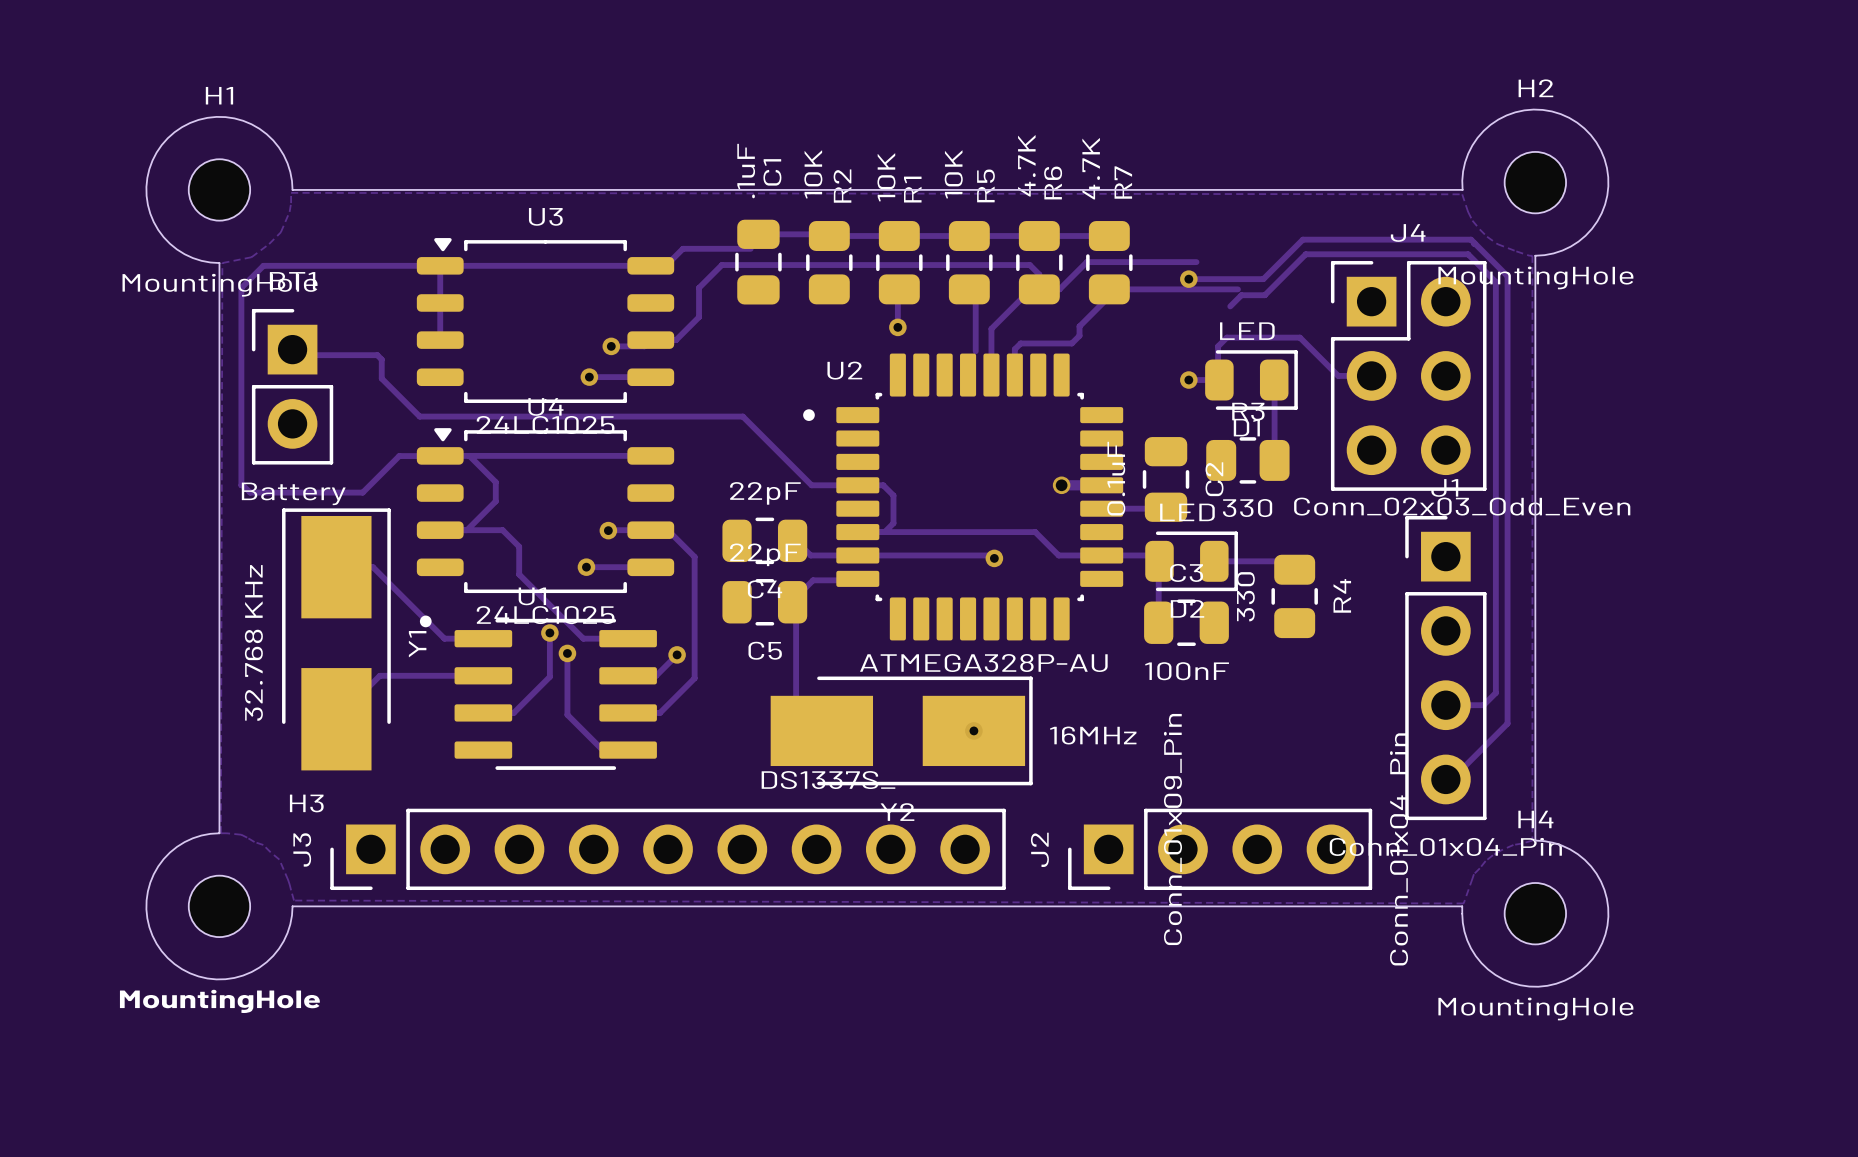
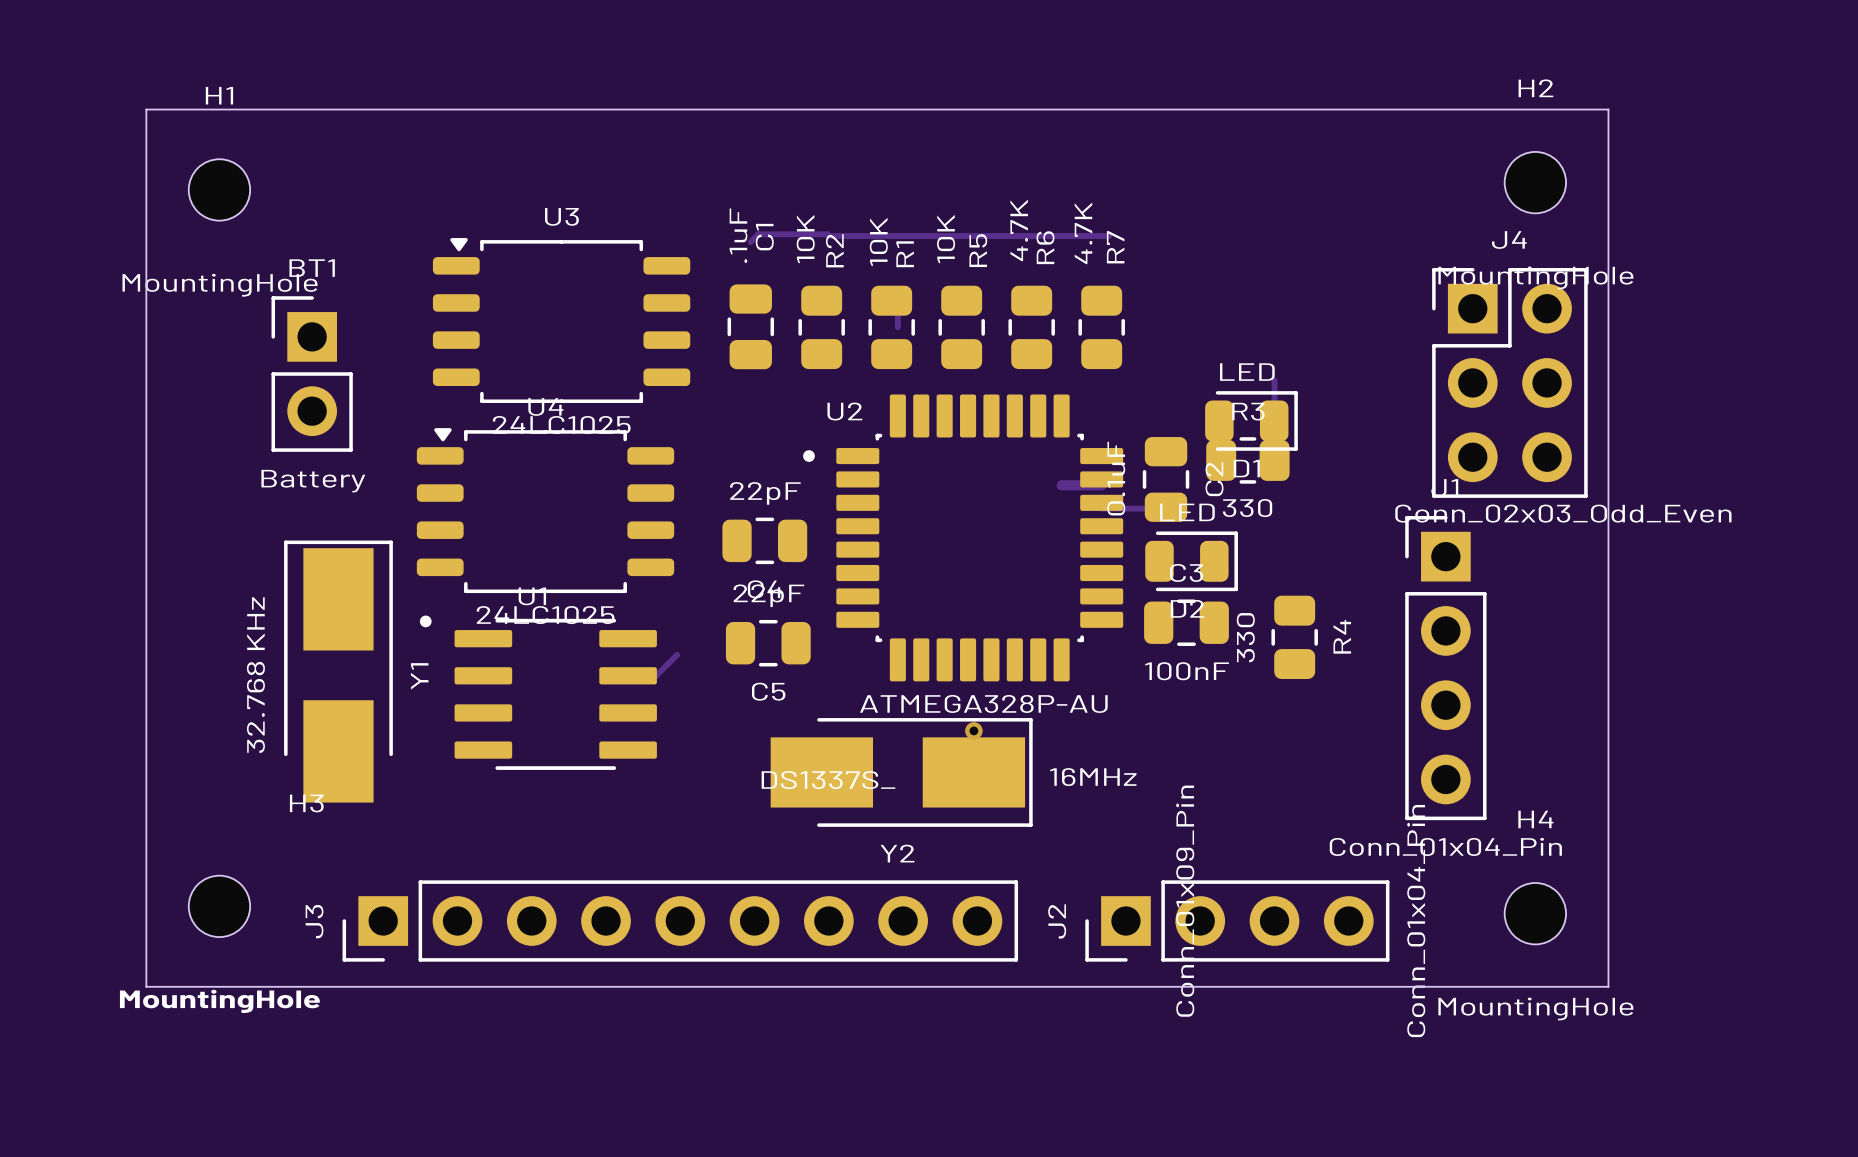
board edge: (292, 189) (1462, 189) (1463, 171) (1468, 153) (1477, 137) (1490, 124) (1506, 115) (1533, 109) (1551, 111) (1569, 117) (1590, 135) (1601, 150) (1606, 167) (1608, 186) (1601, 213) (1585, 235) (1562, 250) (1535, 255) (1535, 840) (1553, 842) (1570, 849) (1584, 859) (1596, 873) (1606, 898) (1608, 916) (1605, 934) (1598, 951) (1580, 971) (1556, 983) (1529, 986) (1511, 982) (1495, 974) (1475, 956) (1464, 931) (1462, 906) (292, 906) (290, 924) (283, 941) (273, 955) (259, 967) (243, 975) (225, 979) (198, 976) (182, 969) (161, 951) (152, 935) (147, 918) (146, 900) (153, 874) (169, 852) (192, 838) (219, 833) (219, 263) (192, 258) (176, 249) (163, 237) (153, 222) (147, 204) (147, 177) (156, 152) (174, 132) (198, 119) (225, 117) (251, 124) (273, 140) (287, 163) (292, 189) -> (146, 109) (146, 986) (1608, 986) (1608, 109) (146, 109)
zone outline: (291, 192) (1462, 194) (1472, 220) (1487, 236) (1497, 244) (1532, 255) (1532, 840) (1513, 844) (1500, 850) (1485, 861) (1473, 874) (1463, 903) (294, 900) (279, 859) (263, 844) (241, 834) (220, 833) (222, 263) (251, 257) (280, 232) (289, 211) (291, 192) -> none
track: (750, 248) (682, 248) (665, 265) (263, 265) (241, 287) (241, 485) (250, 492) (362, 492) (399, 456) (440, 456) -> none
C1 position: (758, 262) -> (750, 326)
R2 position: (829, 262) -> (821, 327)
R1 position: (899, 262) -> (891, 327)
R5 position: (969, 262) -> (961, 327)
R6 position: (1039, 262) -> (1031, 327)
R7 position: (1109, 262) -> (1101, 327)
track: (1196, 262) (1086, 262) (1059, 289) (1030, 289) (991, 328) (991, 375) -> none
track: (440, 265) (440, 340) -> none
track: (1188, 279) (1263, 279) (1302, 239) (1471, 239) (1507, 276) (1507, 723) (1450, 780) (1445, 779) -> none
via: (1188, 279) -> none
track: (969, 289) (975, 295) (975, 351) -> none
track: (1039, 289) (1039, 274) (1029, 265) (721, 265) (699, 287) (699, 317) (676, 340) (650, 340) (644, 346) (611, 346) -> none
track: (1237, 289) (1109, 289) (1109, 296) (1079, 326) (1079, 335) (1071, 343) (1020, 343) (1014, 349) (1014, 375) -> none
track: (1230, 306) (1241, 295) (1264, 295) (1305, 254) (1468, 254) (1495, 282) (1495, 692) (1483, 705) (1445, 705) -> none
U3 position: (545, 320) -> (561, 320)
via: (897, 327) -> none
via: (611, 346) -> none
track: (292, 349) (298, 355) (377, 355) (381, 359) (381, 378) (419, 416) (742, 416) (811, 485) (883, 485) (893, 495) (893, 523) (884, 532) -> none
track: (1371, 375) (1338, 375) (1299, 337) (1226, 337) (1218, 346) (1219, 380) (1188, 380) -> none
J4 position: (1408, 375) -> (1509, 382)
track: (589, 377) (650, 377) -> none
via: (589, 377) -> none
via: (1188, 380) -> none
D1 position: (1251, 380) -> (1251, 420)
BT1 position: (292, 386) -> (312, 374)
track: (440, 455) (650, 455) -> none
track: (469, 455) (495, 482) (495, 501) (466, 530) -> none
via: (1061, 485) -> none
U2 position: (963, 496) -> (963, 537)
track: (440, 530) (502, 530) (519, 546) (519, 574) (583, 638) (628, 638) -> none
track: (608, 530) (667, 530) (694, 556) (694, 678) (659, 712) (628, 712) -> none
via: (608, 530) -> none
track: (857, 532) (1035, 532) (1058, 555) (1153, 555) (1159, 561) (1158, 622) -> none
track: (796, 540) (810, 555) (991, 555) (994, 558) -> none
via: (994, 558) -> none
track: (1214, 561) (1286, 561) (1294, 569) -> none
track: (336, 567) (372, 567) (444, 638) (483, 638) -> none
track: (586, 567) (650, 567) -> none
via: (586, 567) -> none
track: (857, 578) (813, 580) (796, 597) (796, 697) -> none
R4 position: (1294, 596) -> (1294, 637)
C5 position: (764, 602) -> (768, 643)
track: (549, 632) (549, 676) (513, 712) (483, 712) -> none
via: (549, 632) -> none
Y1 position: (336, 639) -> (338, 671)
track: (567, 653) (567, 714) (602, 750) (628, 750) -> none
via: (567, 653) -> none
via: (677, 654) -> none
track: (483, 675) (379, 675) (336, 719) -> none
Y2 position: (901, 730) -> (901, 772)
J3 position: (668, 849) -> (680, 921)
J2 position: (1220, 849) -> (1237, 921)

